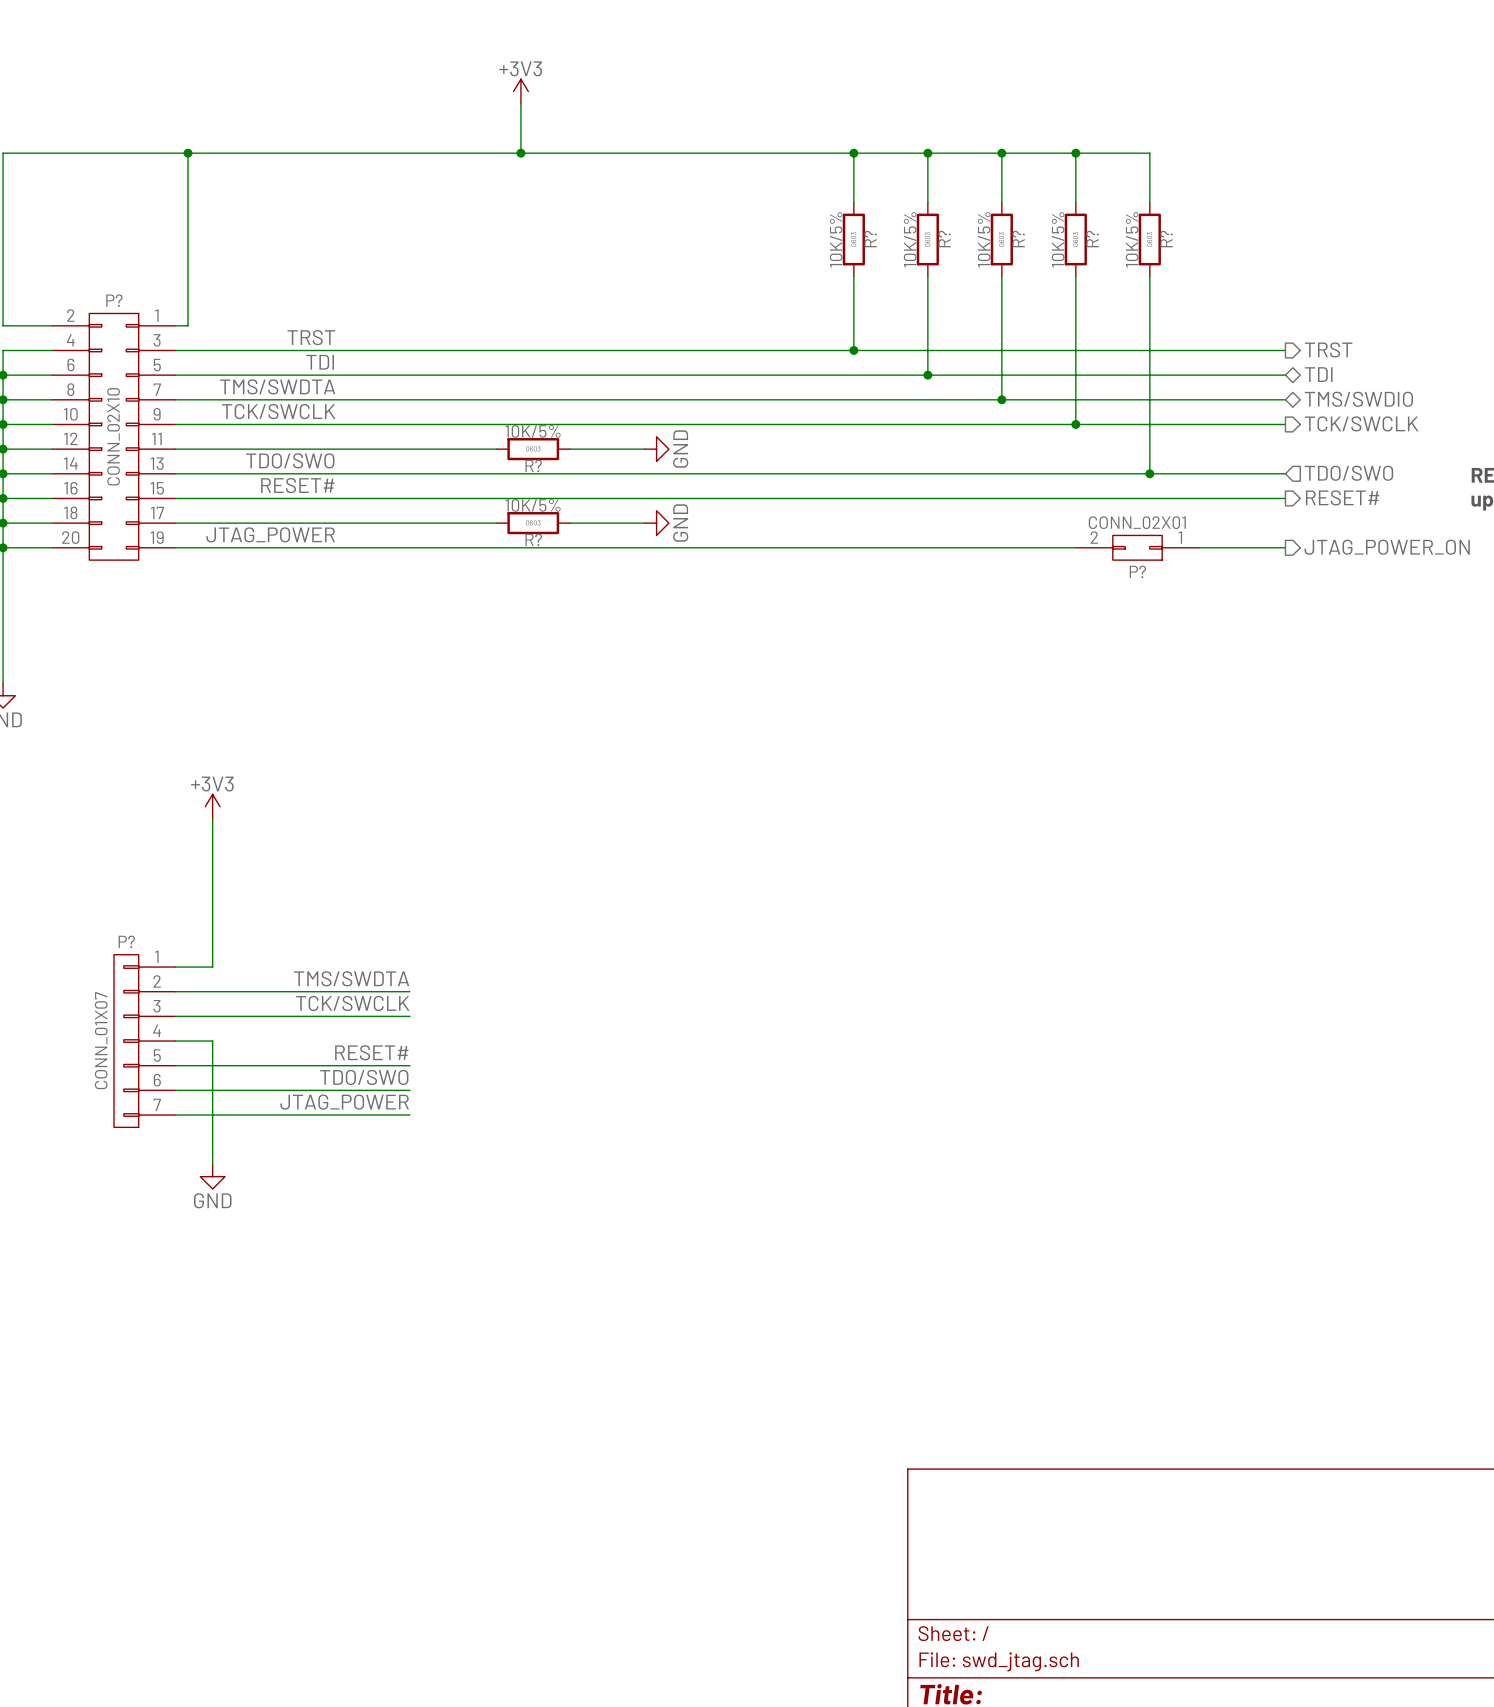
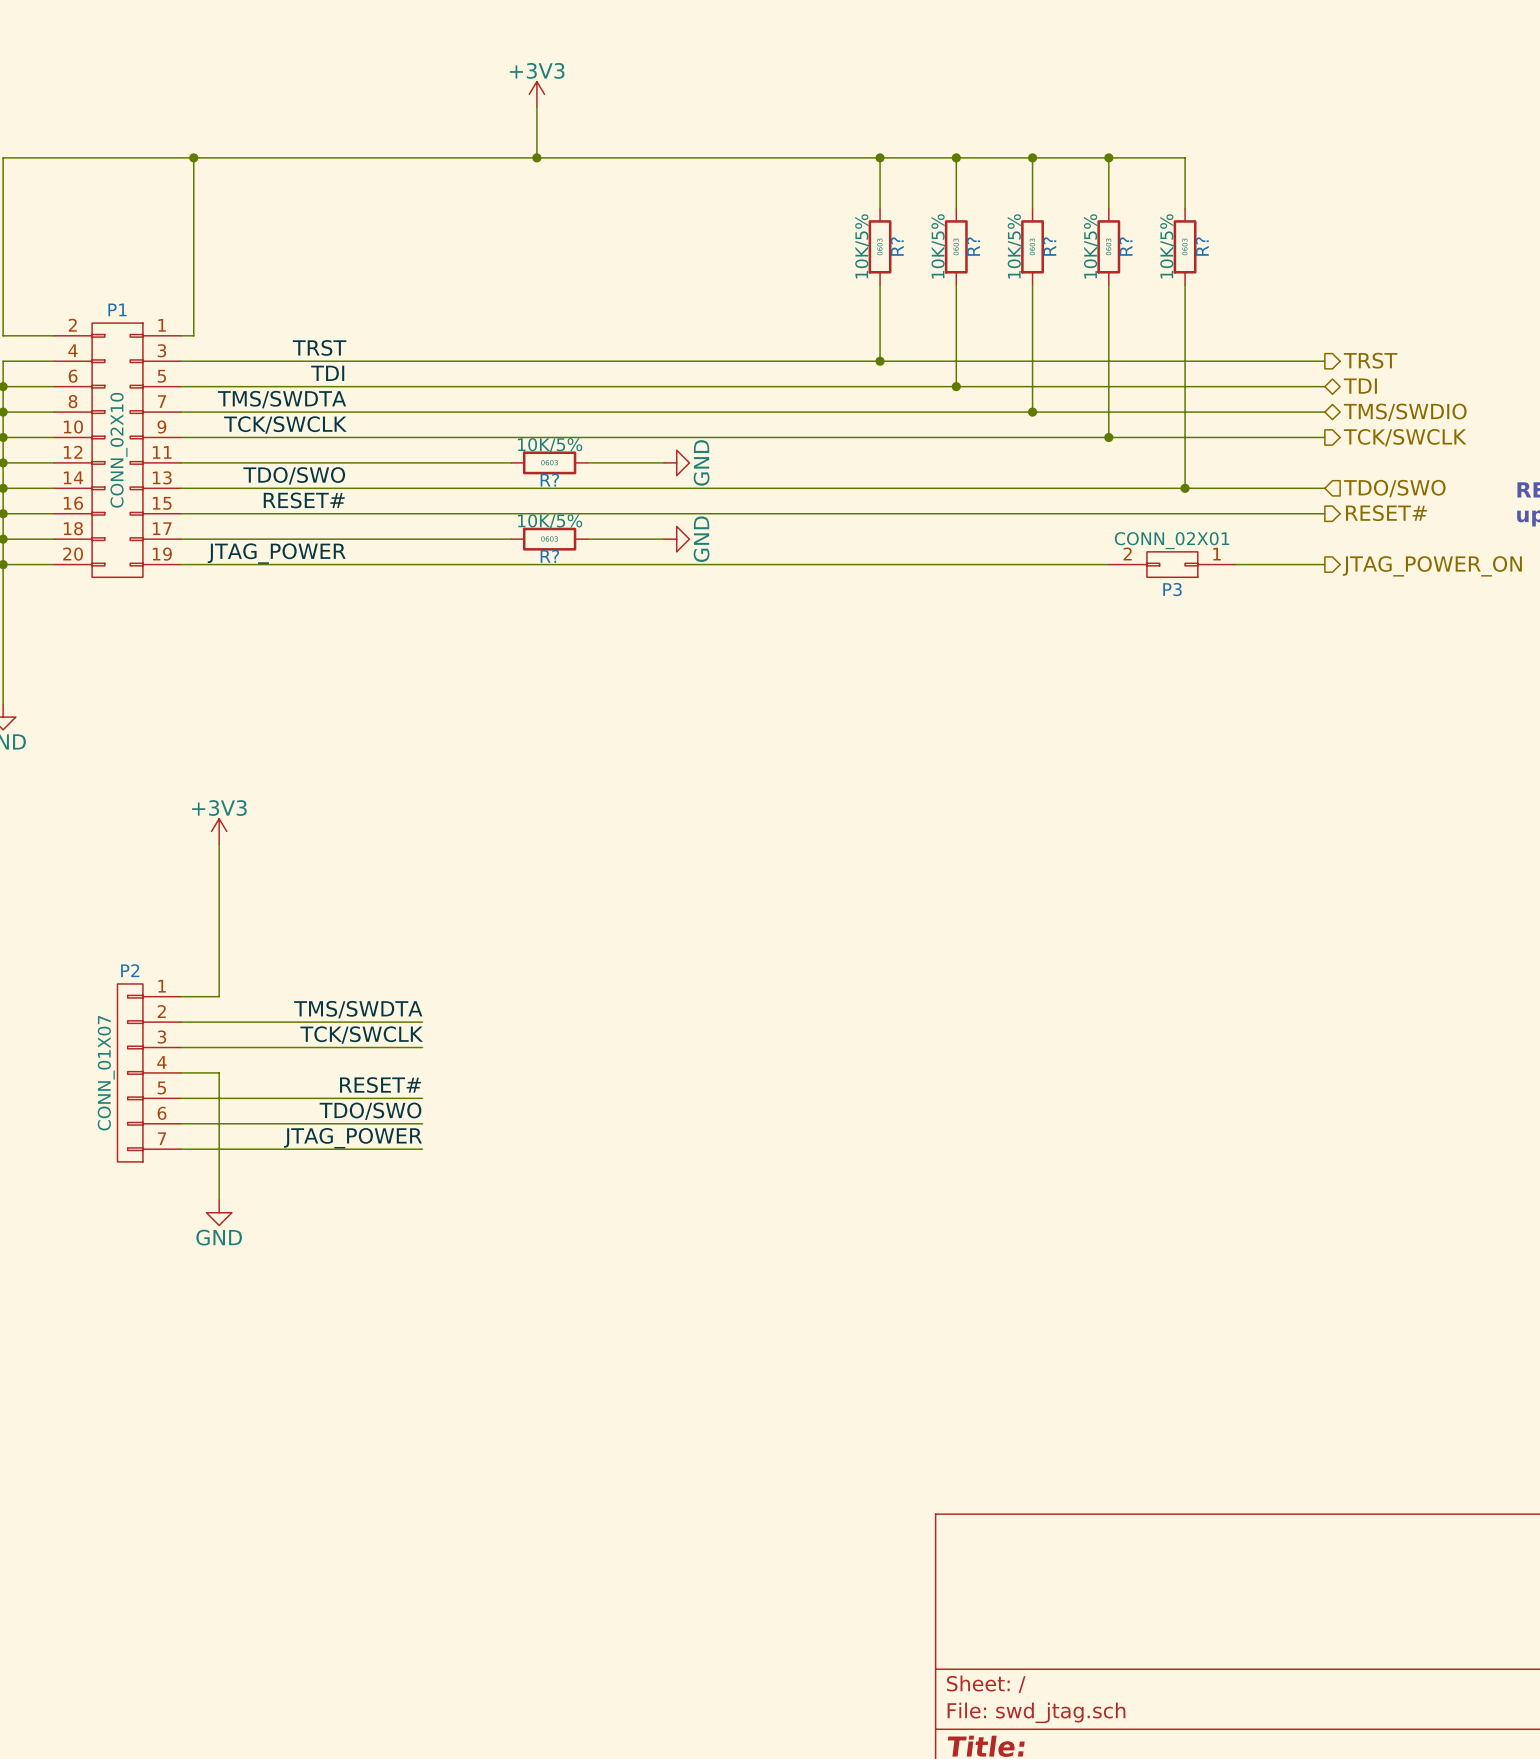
P? name: P? (114, 300) -> P1 (117, 309)
P? name: P? (1137, 571) -> P3 (1172, 589)
P? name: P? (126, 941) -> P2 (130, 970)

